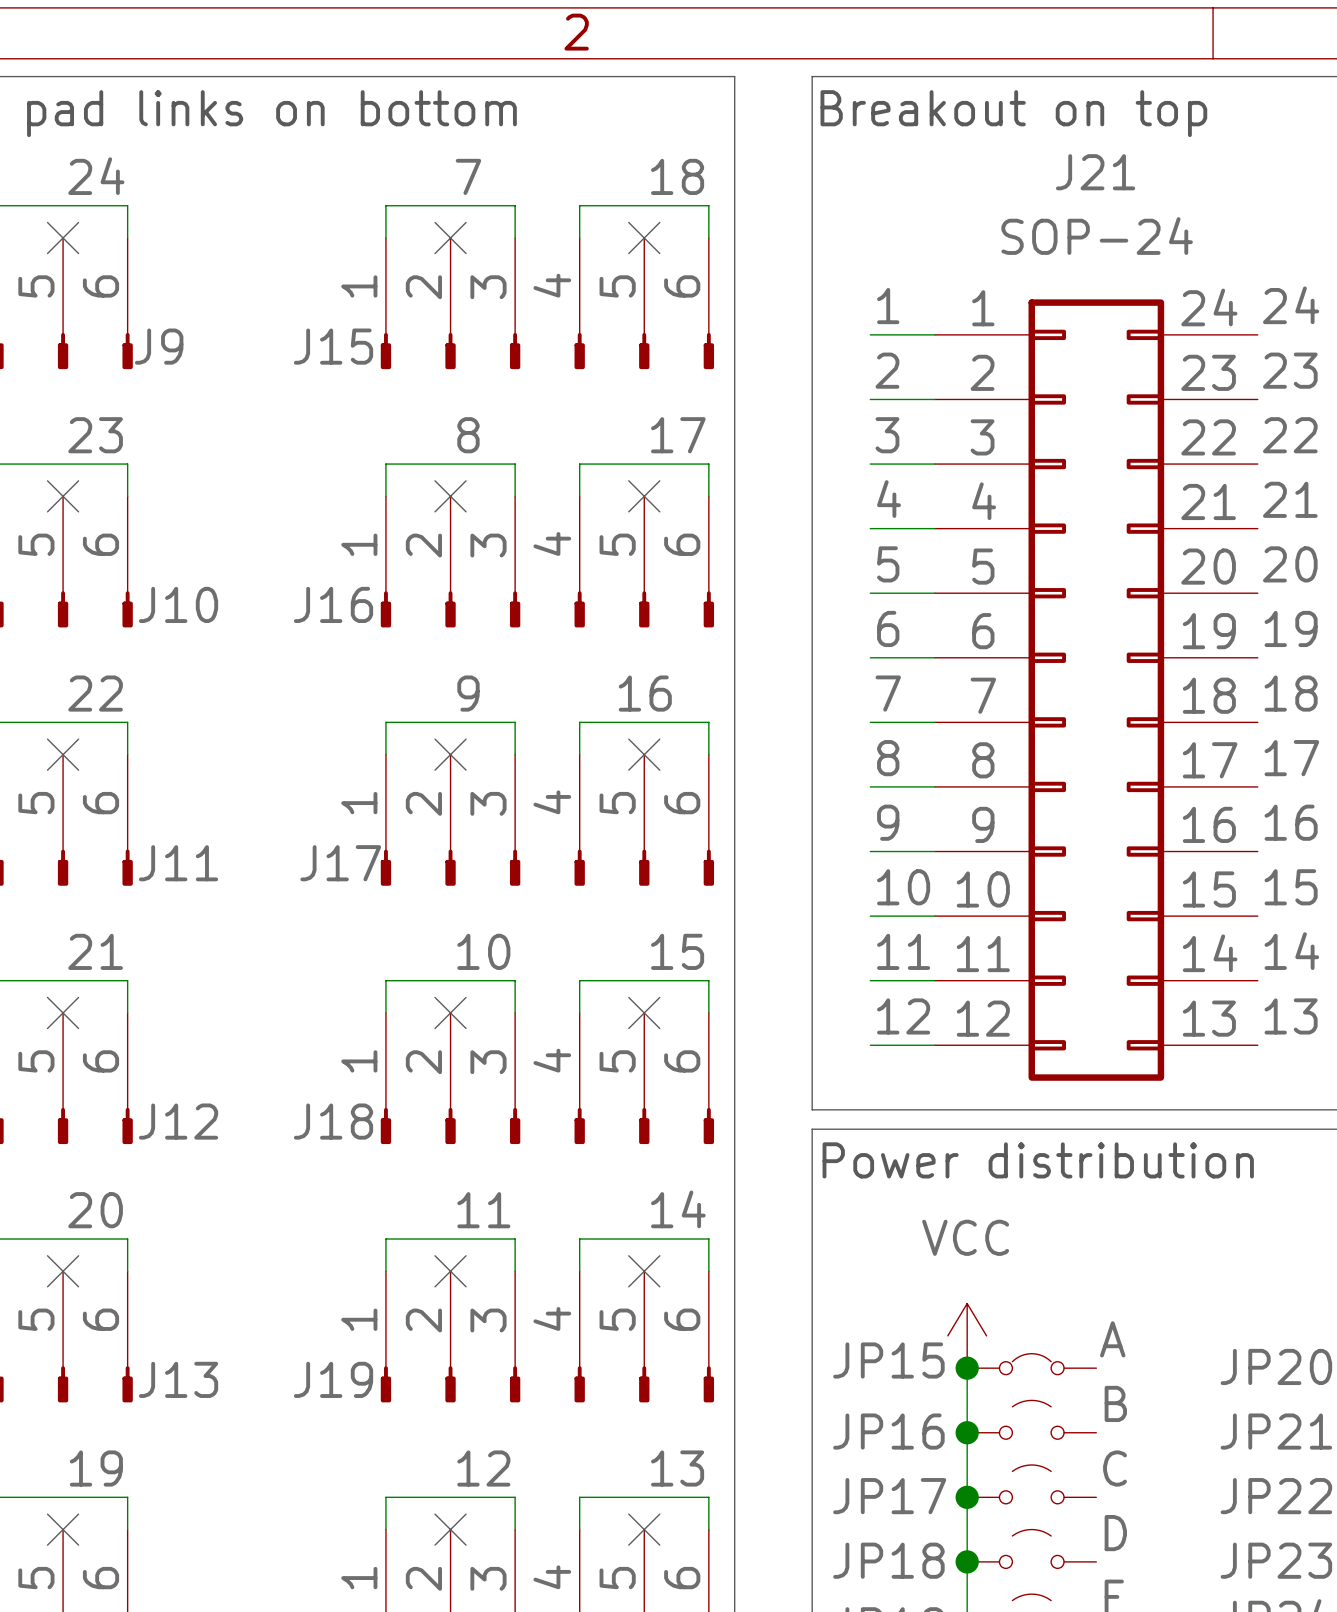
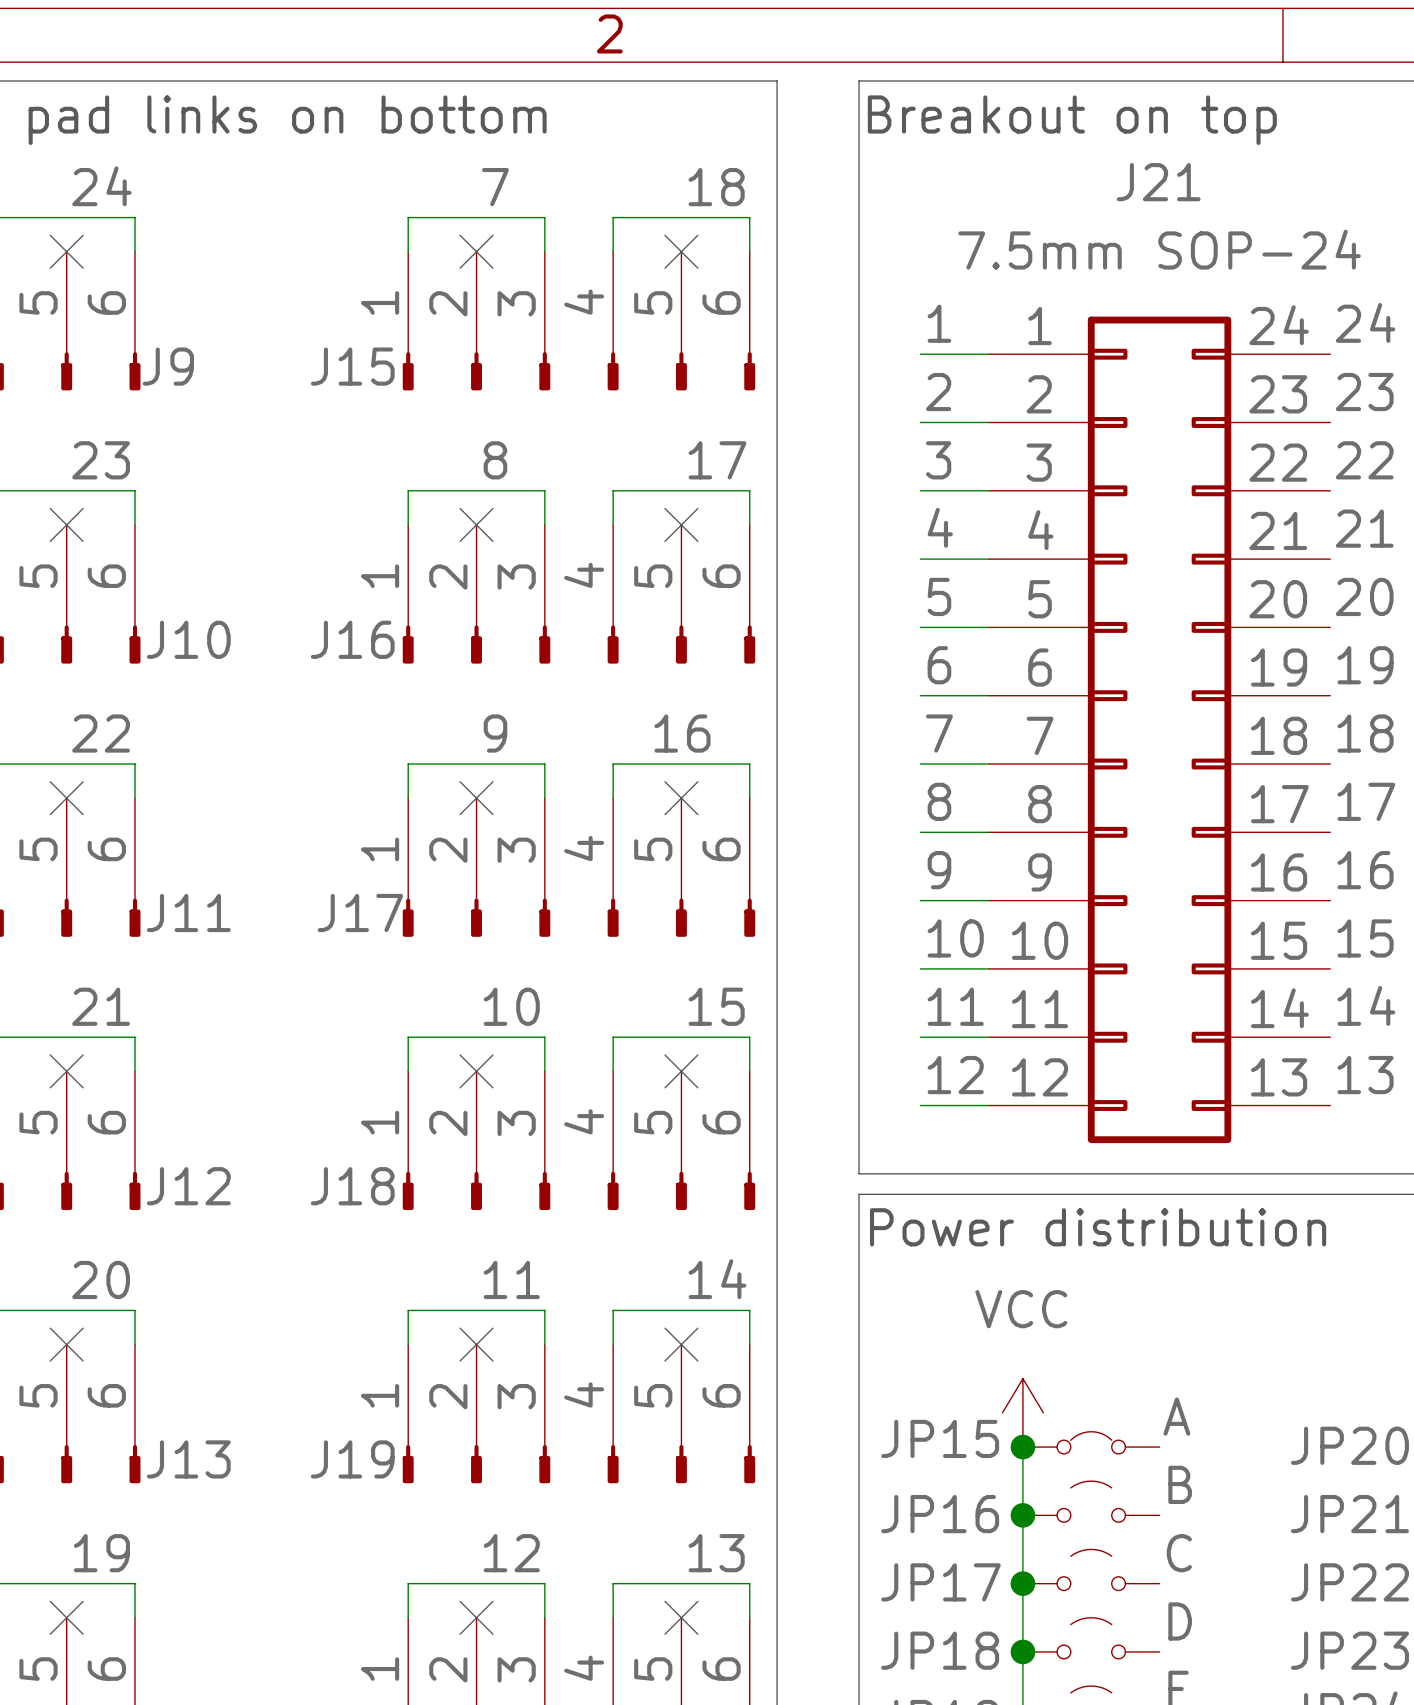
J21 value: SOP-24 (1097, 236) -> 7.5mm SOP-24 (1159, 249)

